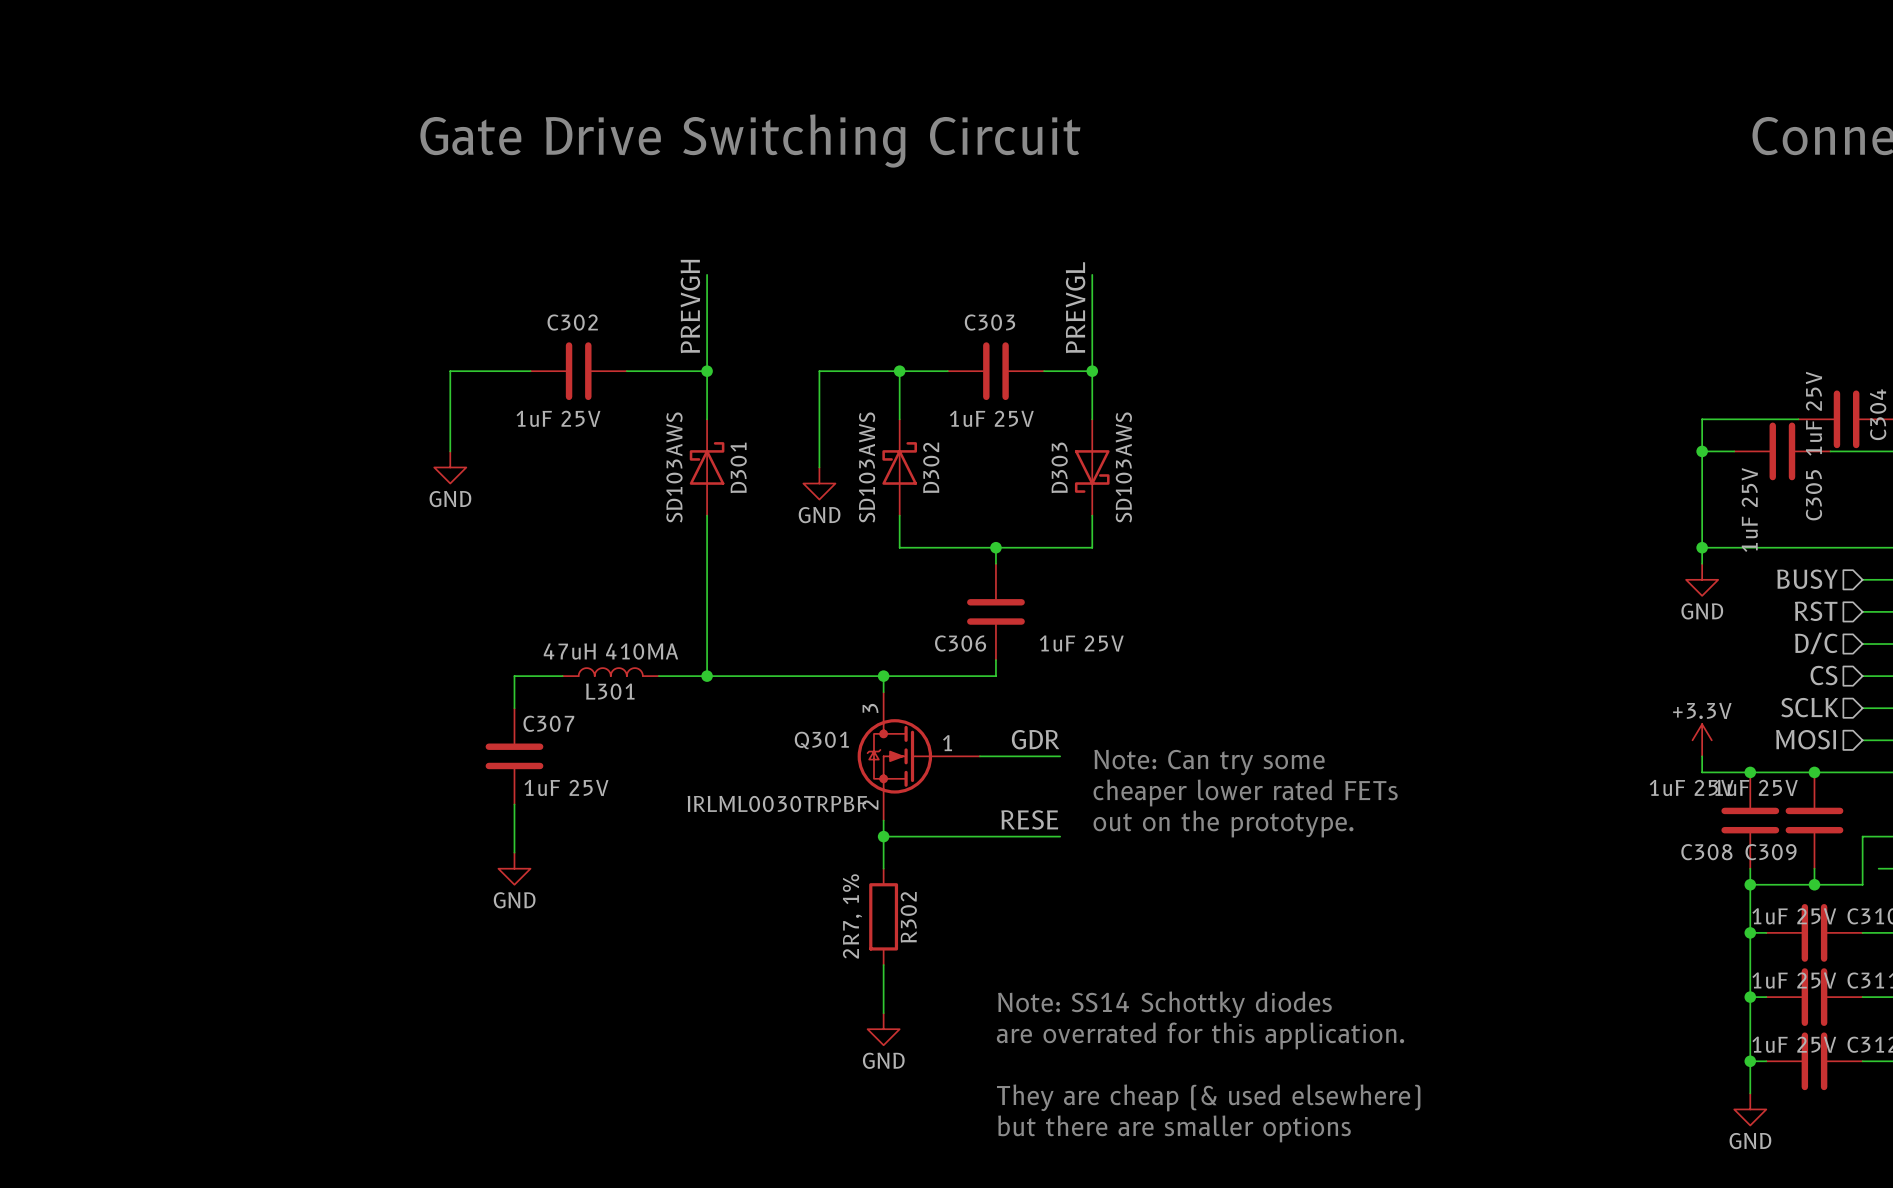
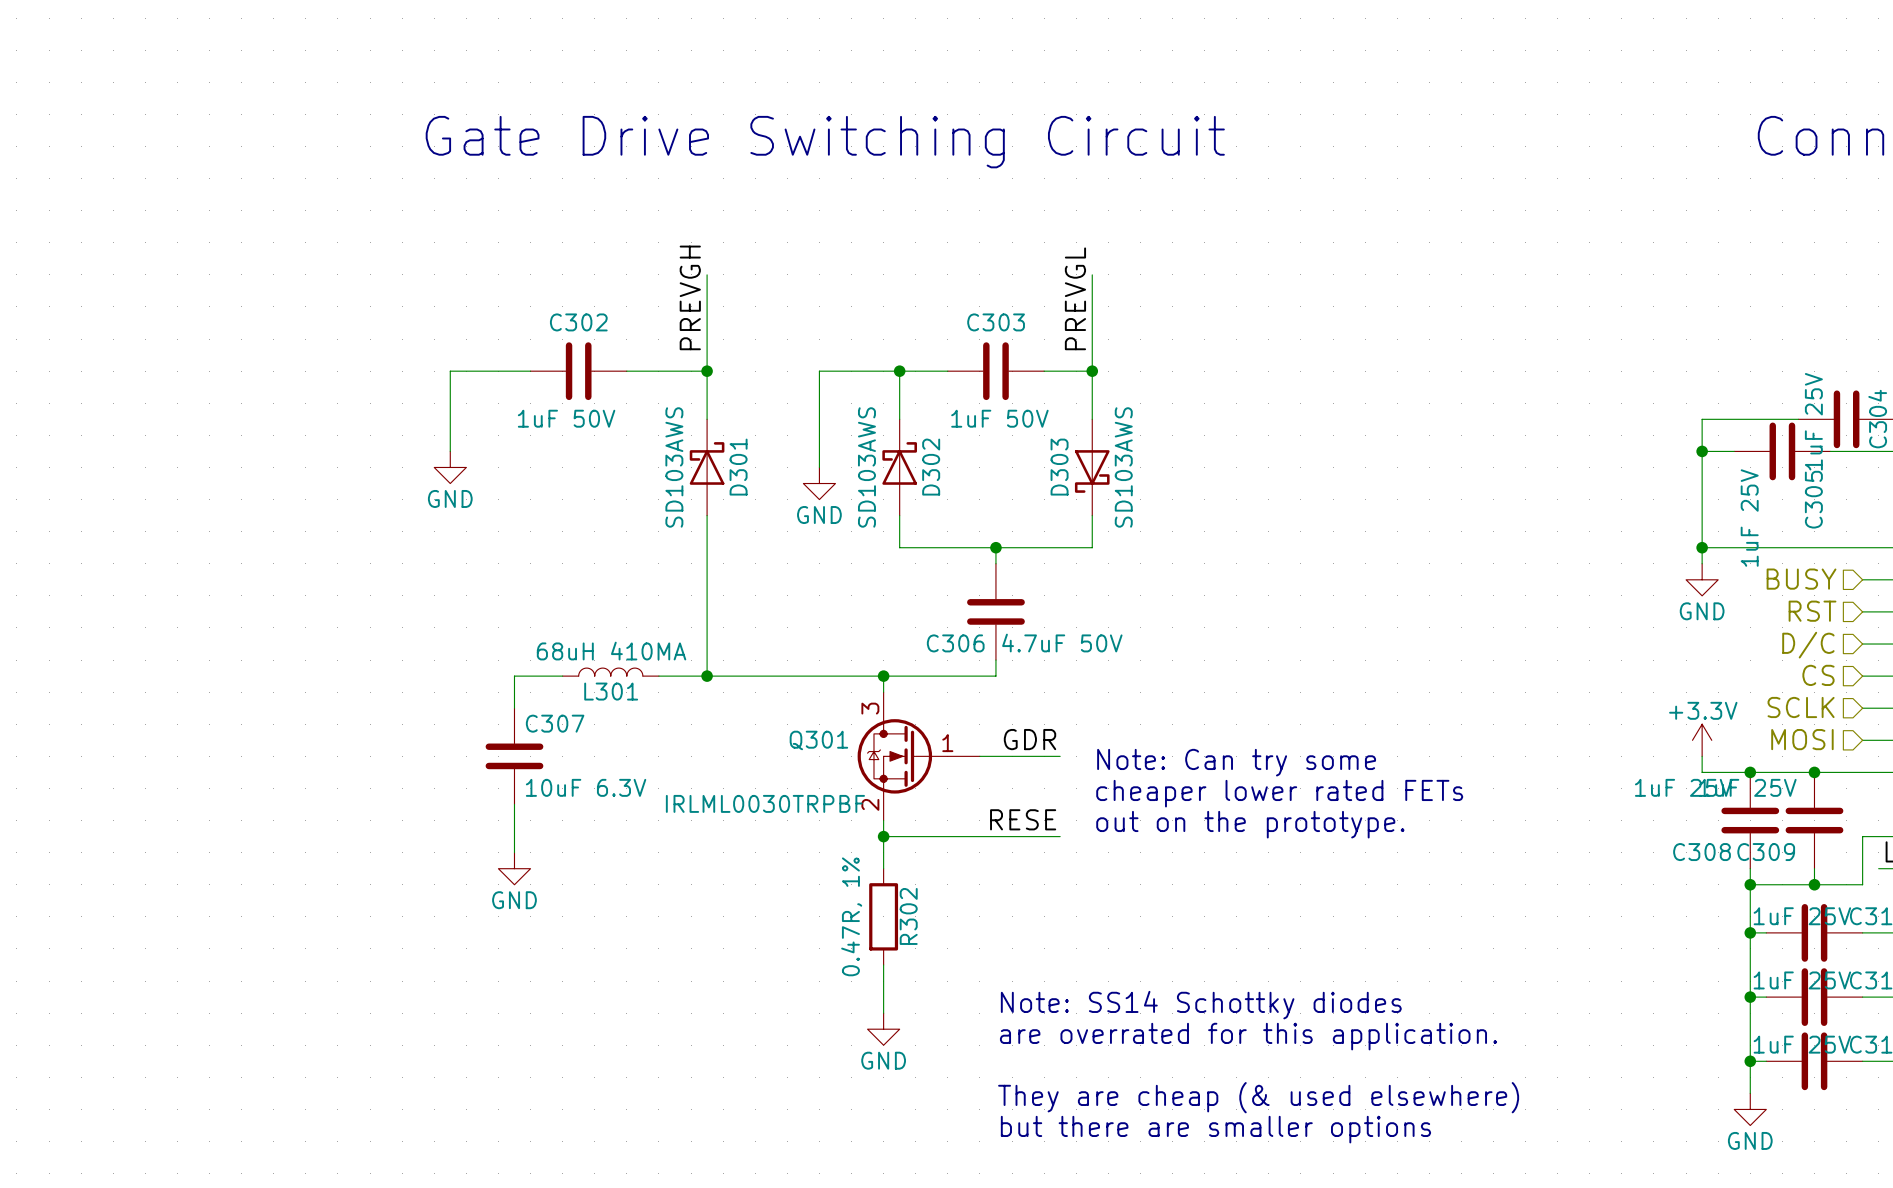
C302 value: 1uF 25V (558, 418) -> 1uF 50V (566, 418)
C303 value: 1uF 25V (991, 418) -> 1uF 50V (999, 418)
C306 value: 1uF 25V (1081, 643) -> 4.7uF 50V (1062, 643)
L301 value: 47uH 410MA (610, 651) -> 68uH 410MA (611, 651)
C307 value: 1uF 25V (566, 787) -> 10uF 6.3V (586, 787)
R302 value: 2R7, 1% (852, 916) -> 0.47R, 1% (851, 916)

